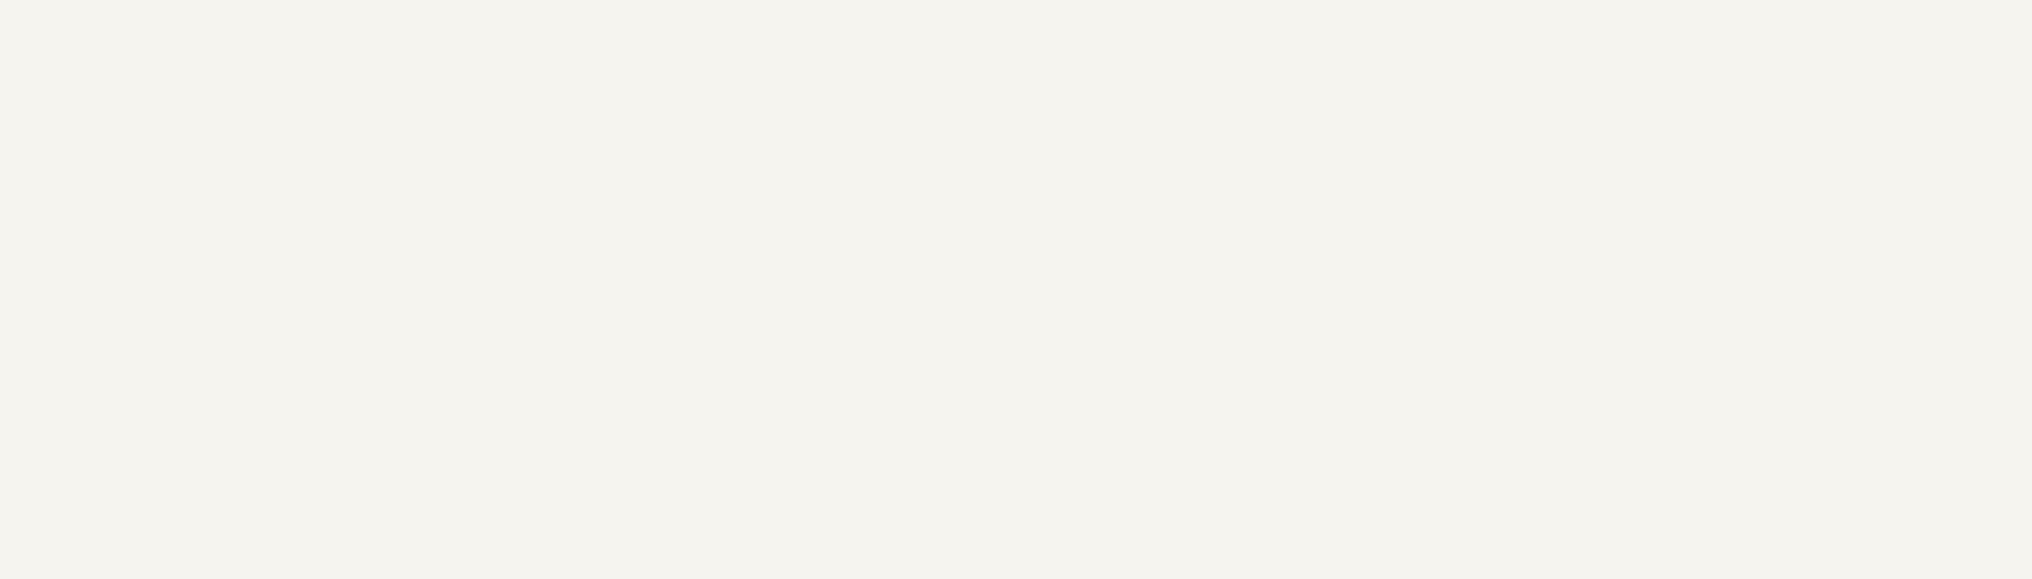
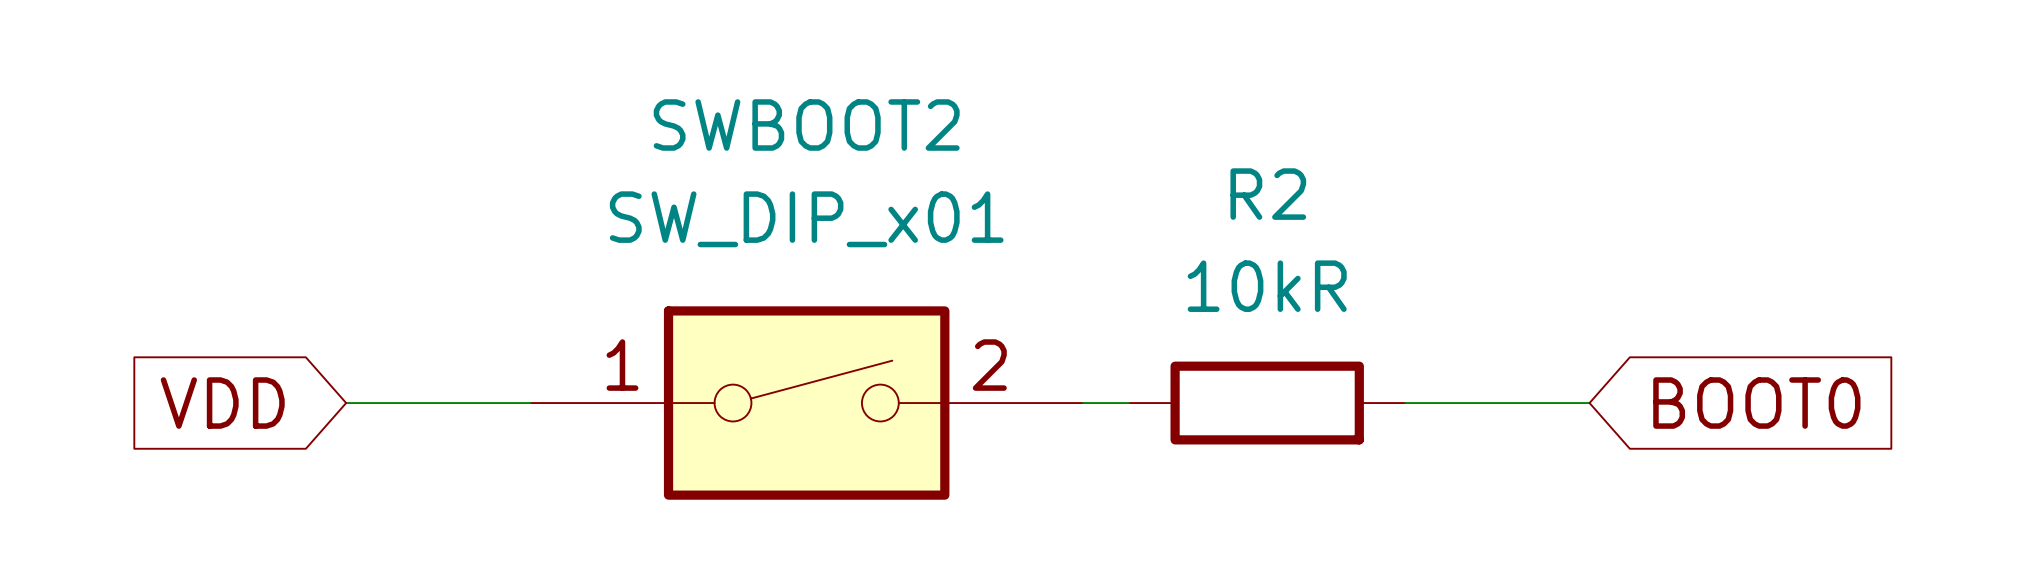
global label: none -> VDD (222, 403)
wire: none -> (346, 403) (530, 403)
SWBOOT2: none -> SW_DIP_x01 (806, 403)
wire: none -> (1082, 403) (1129, 403)
R2: none -> 10kR (1267, 403)
wire: none -> (1405, 403) (1589, 403)
global label: none -> BOOT0 (1756, 403)

